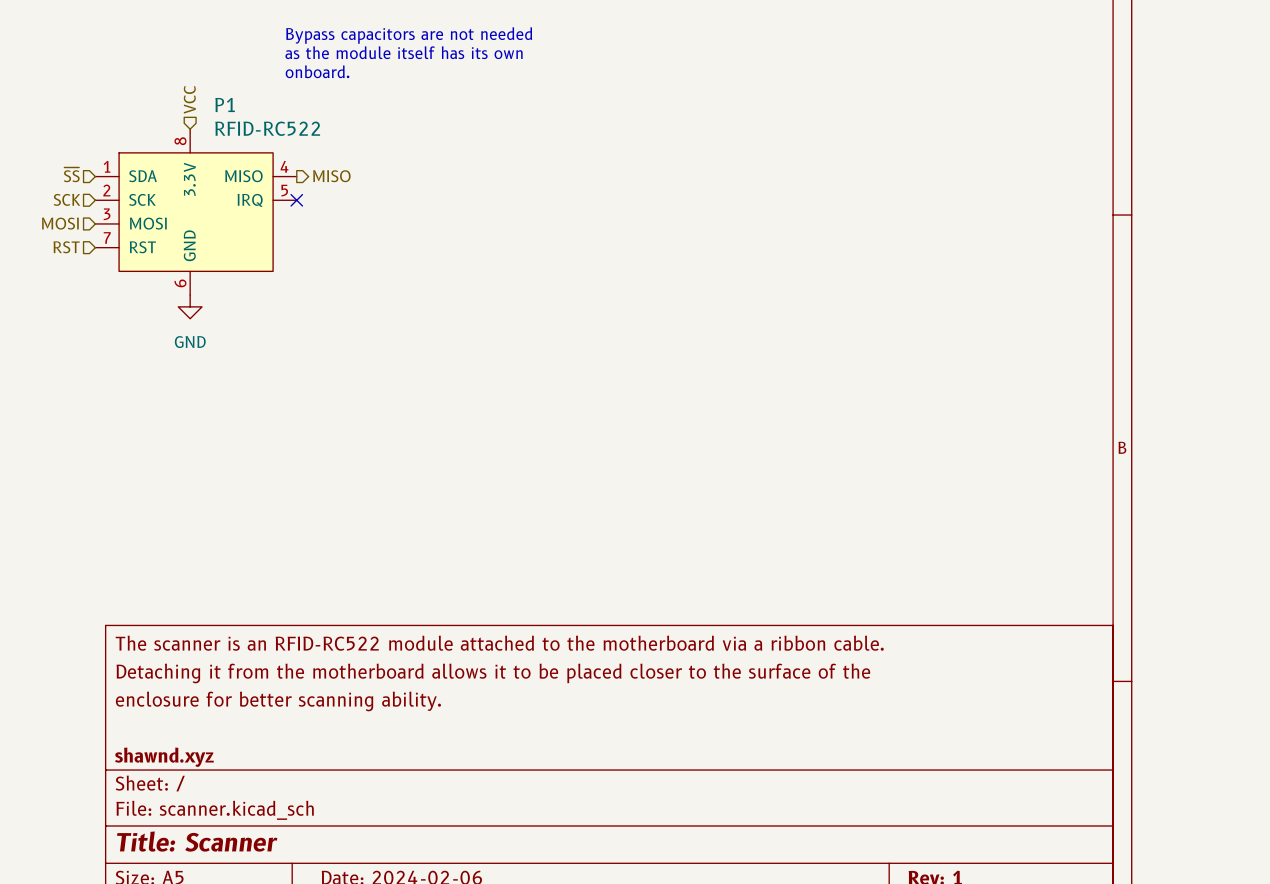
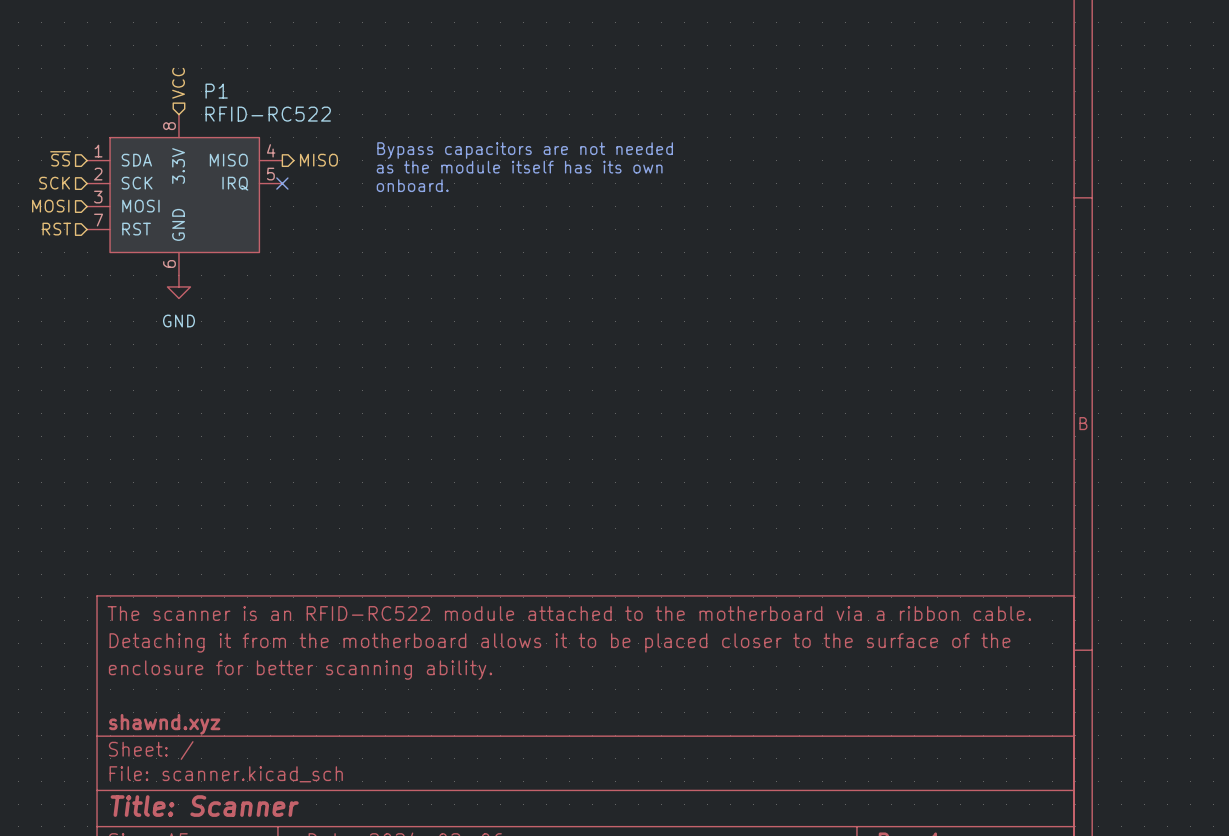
text position: Bypass capacitors are not needed (409, 35) -> Bypass capacitors are not needed (525, 150)
text position: as the module itself has its own (404, 52) -> as the module itself has its own (519, 167)
text position: onboard. (317, 71) -> onboard. (412, 185)

